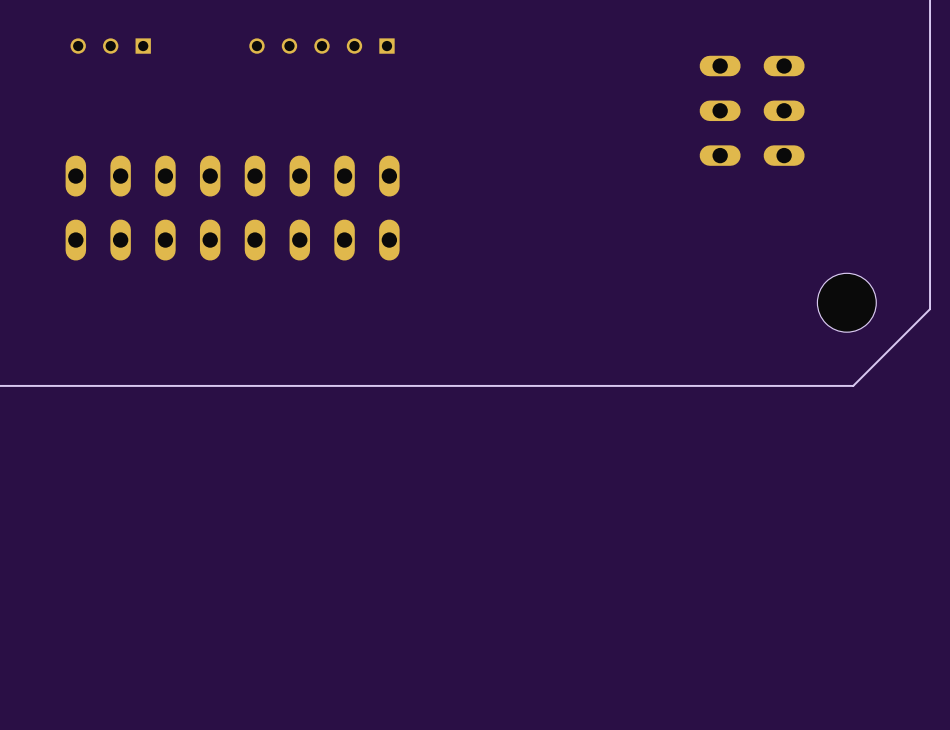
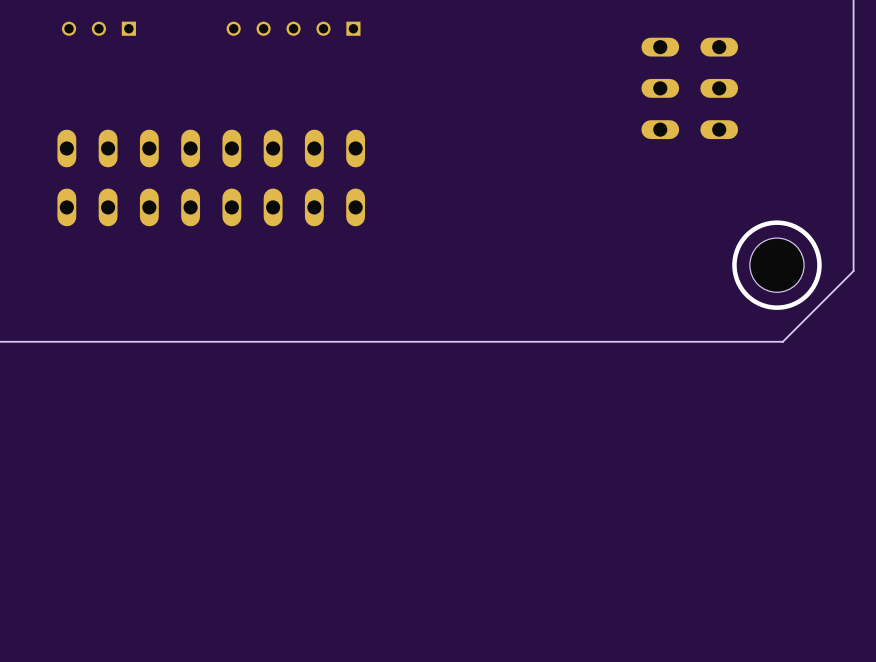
drawing: none -> [732, 220, 822, 310]

